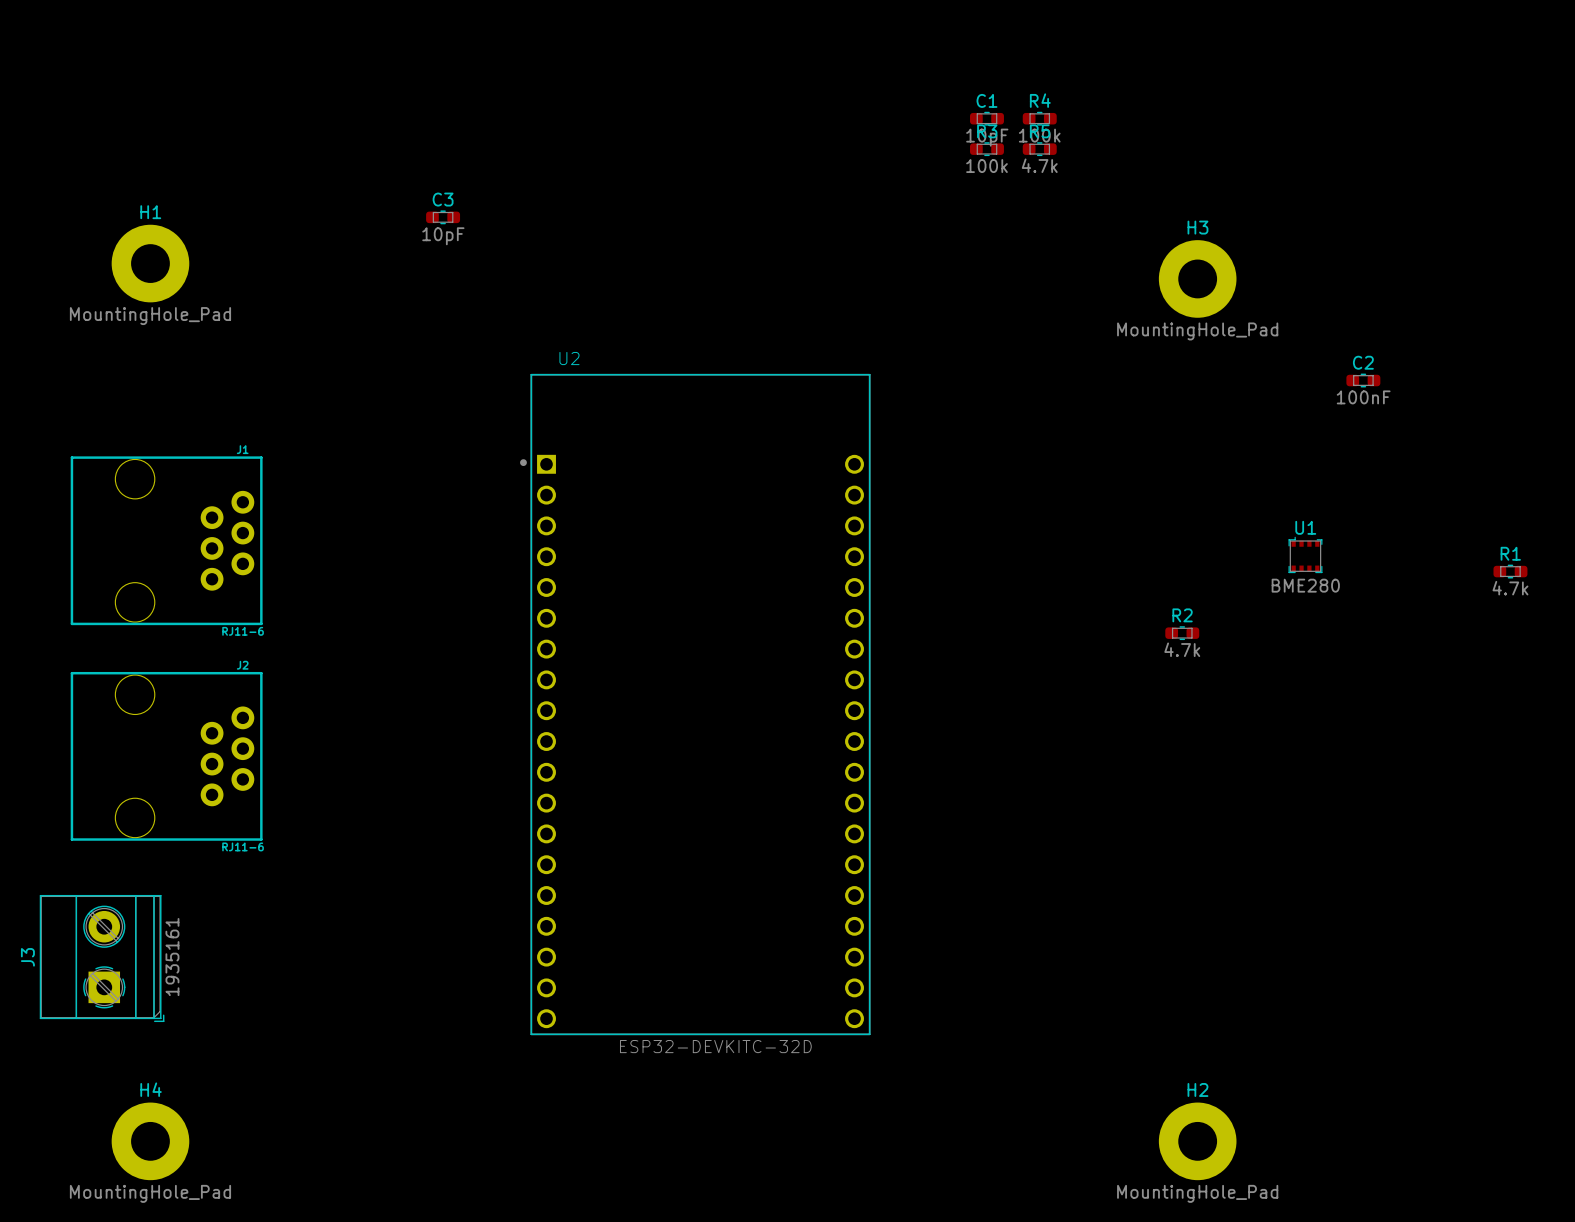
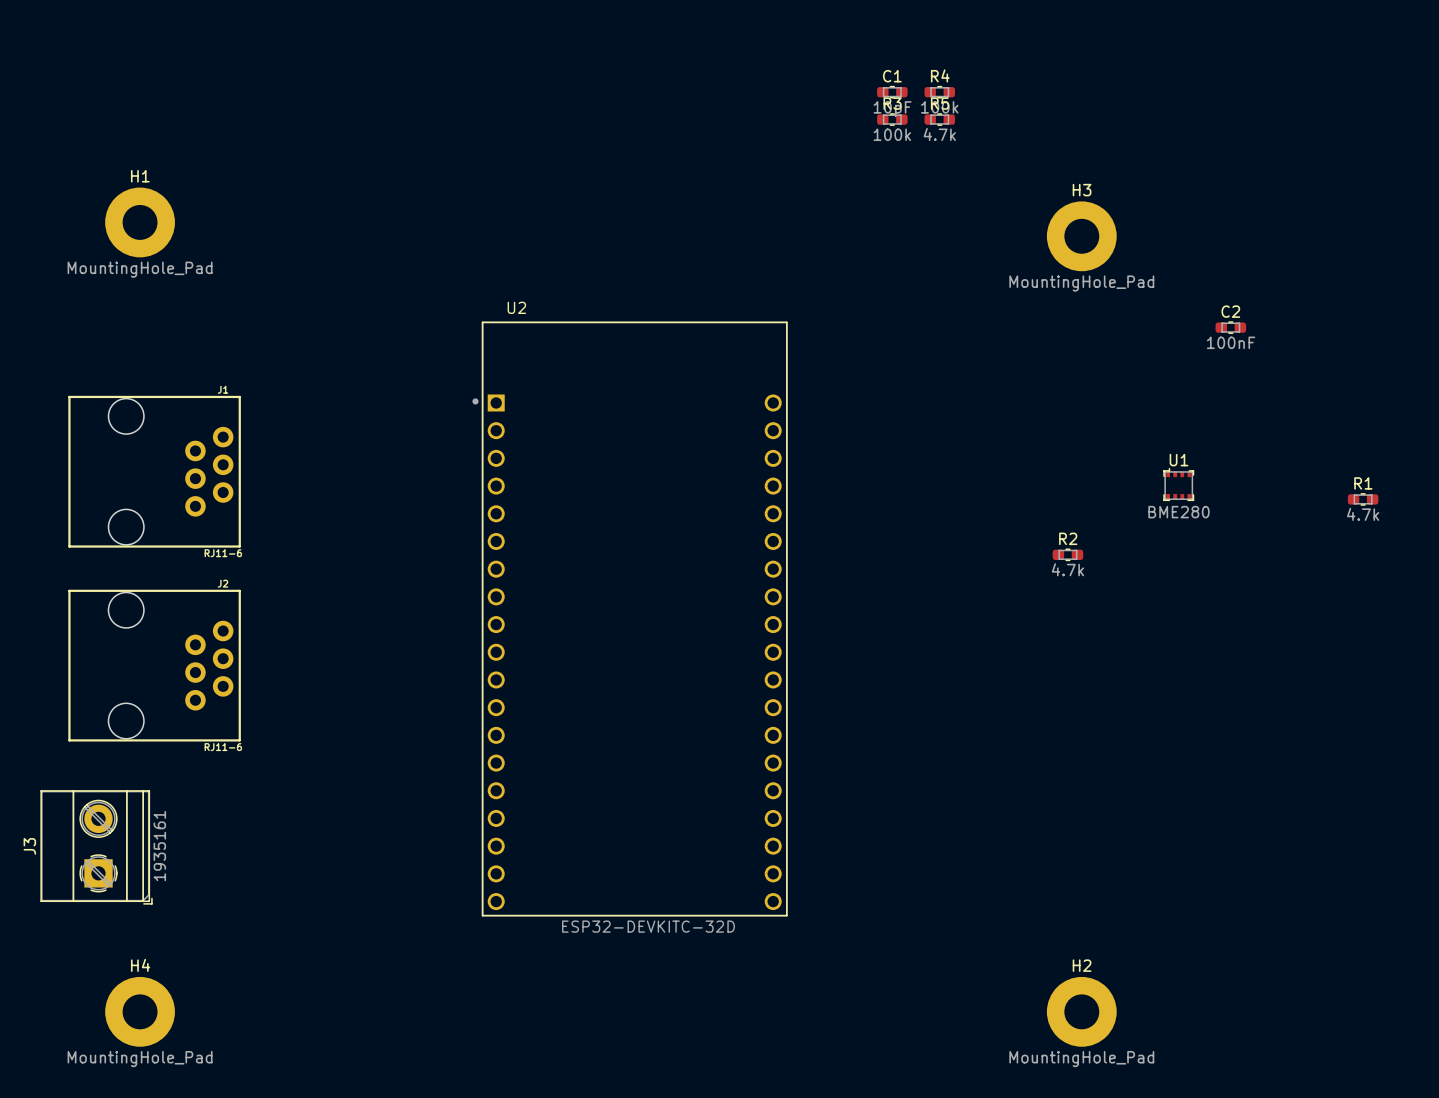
C3: 10pF (443, 217) -> none

